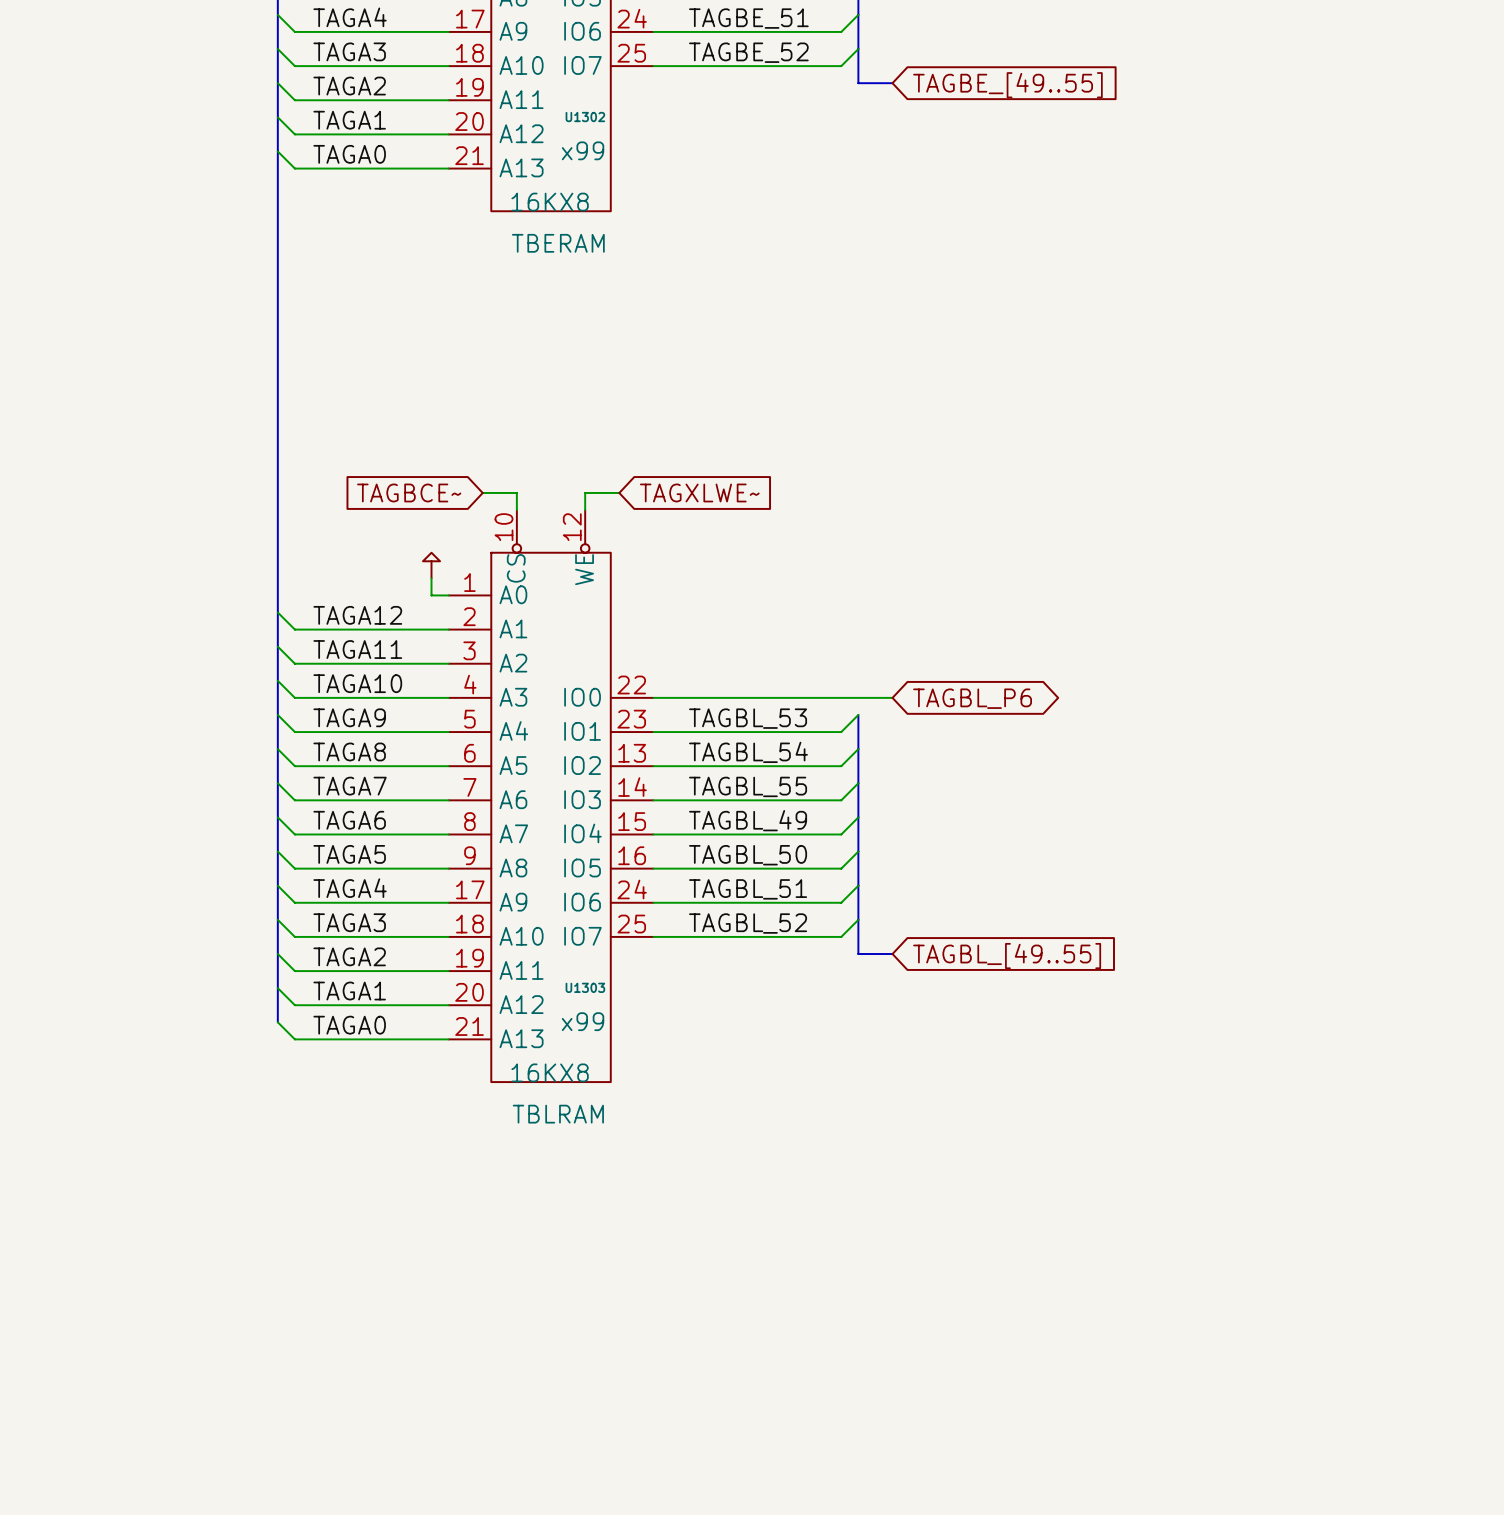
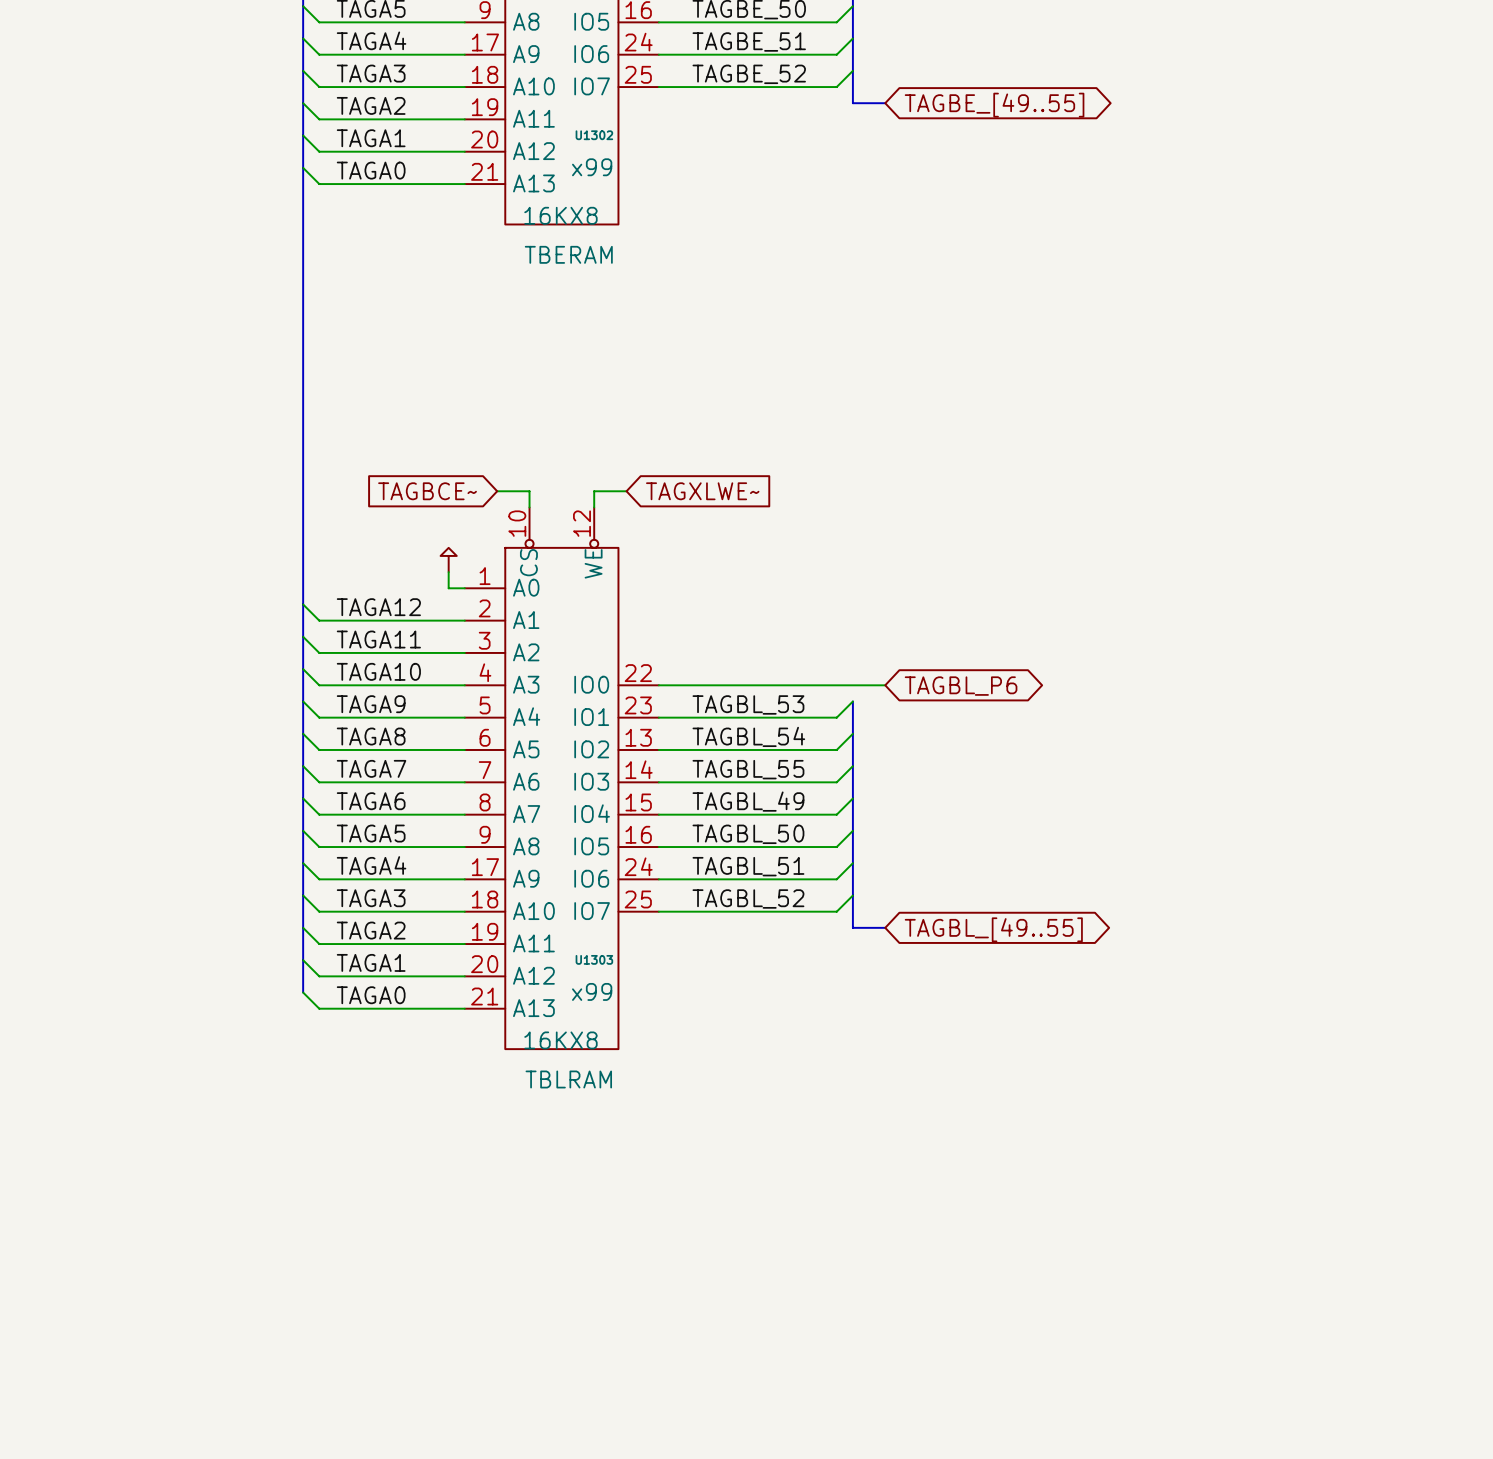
global label shape: input (1007, 85) -> bidirectional (994, 105)
global label shape: input (1007, 956) -> bidirectional (993, 929)

